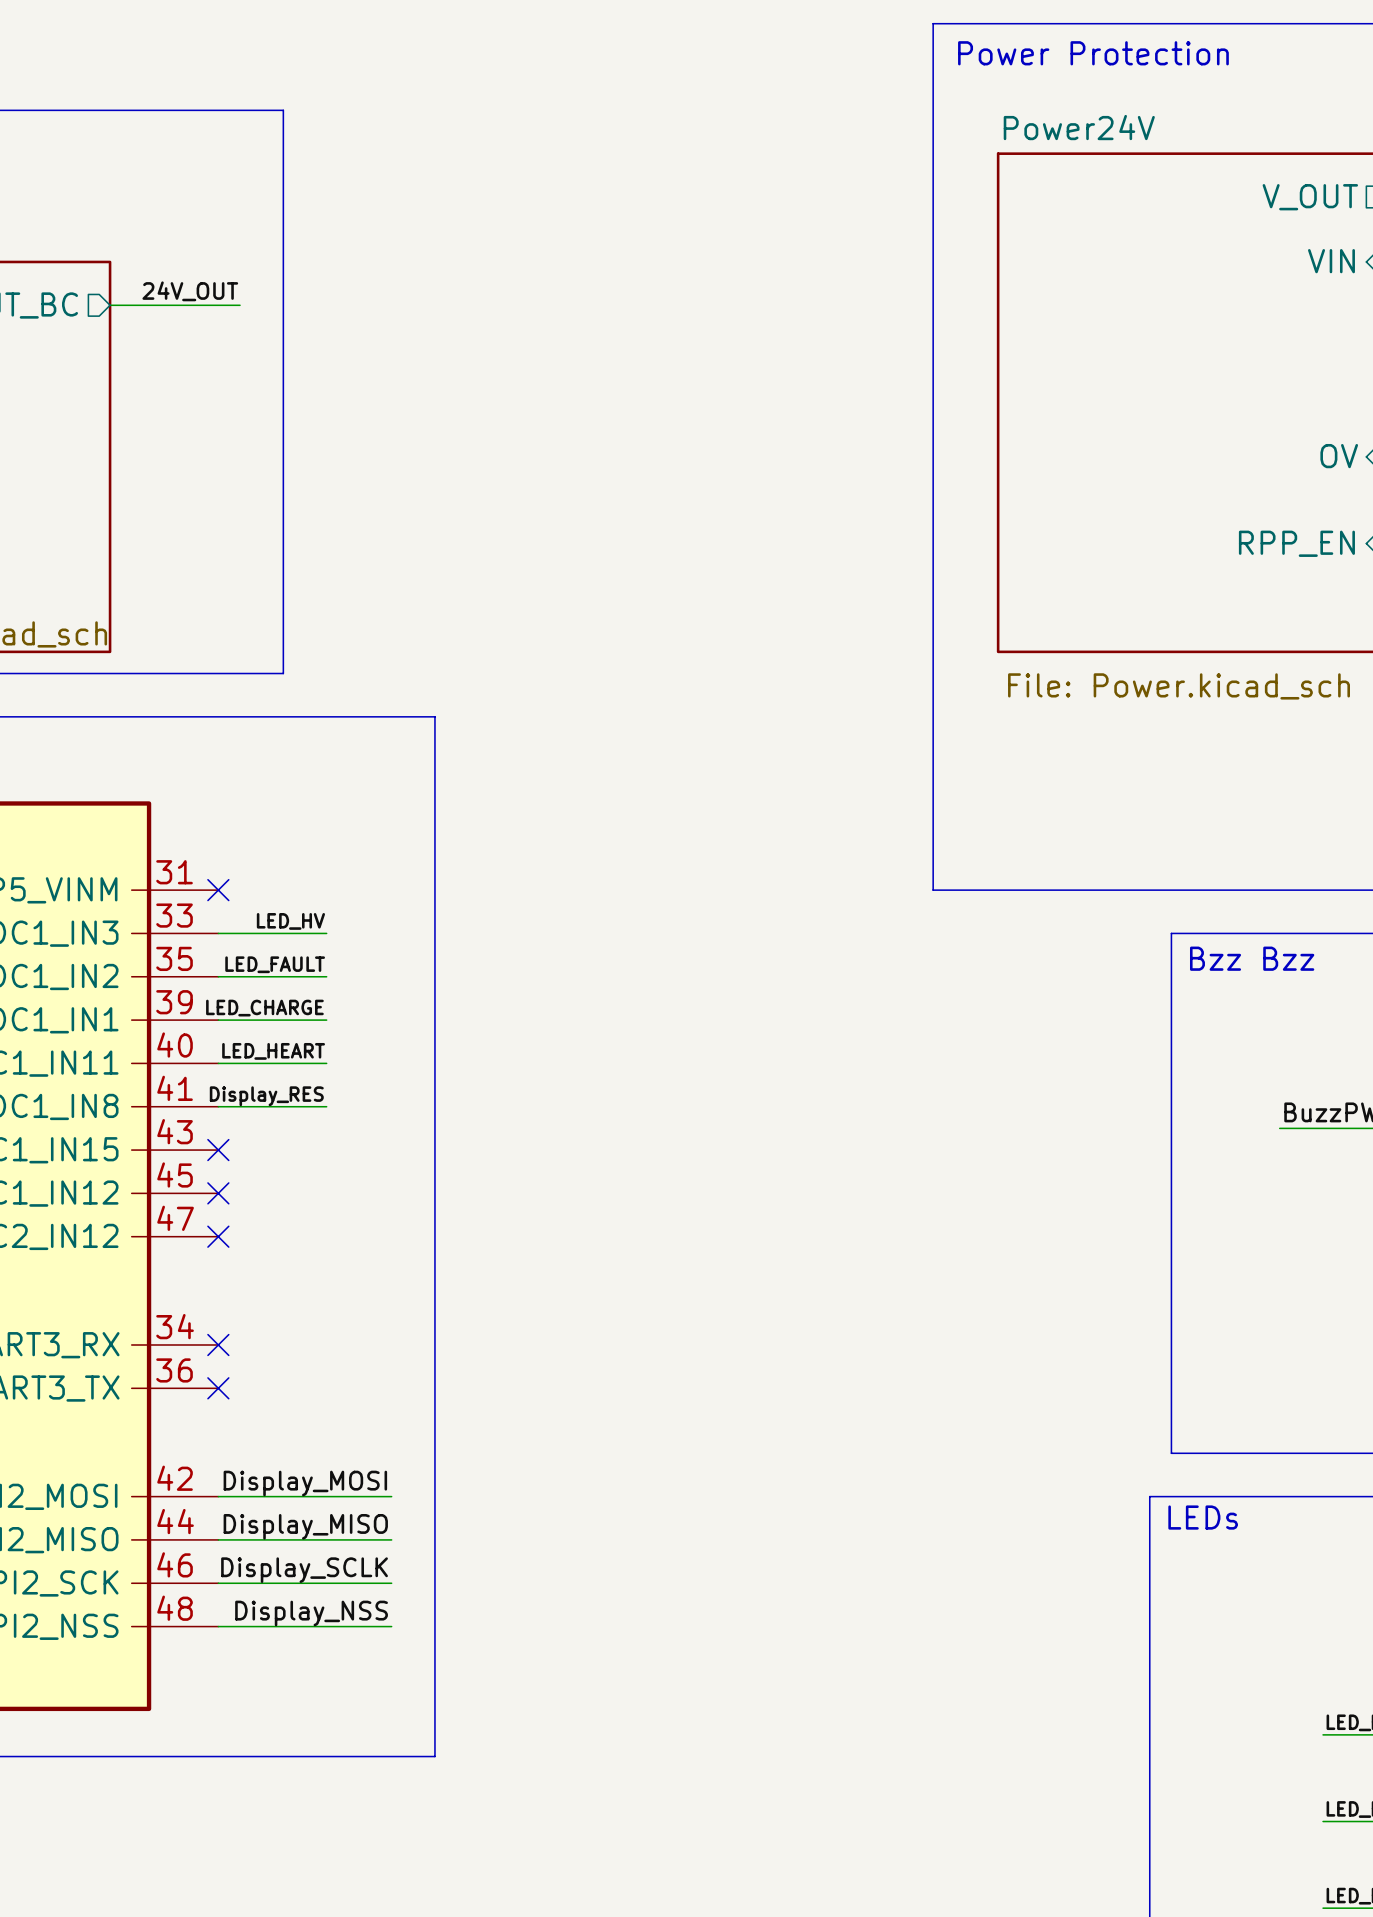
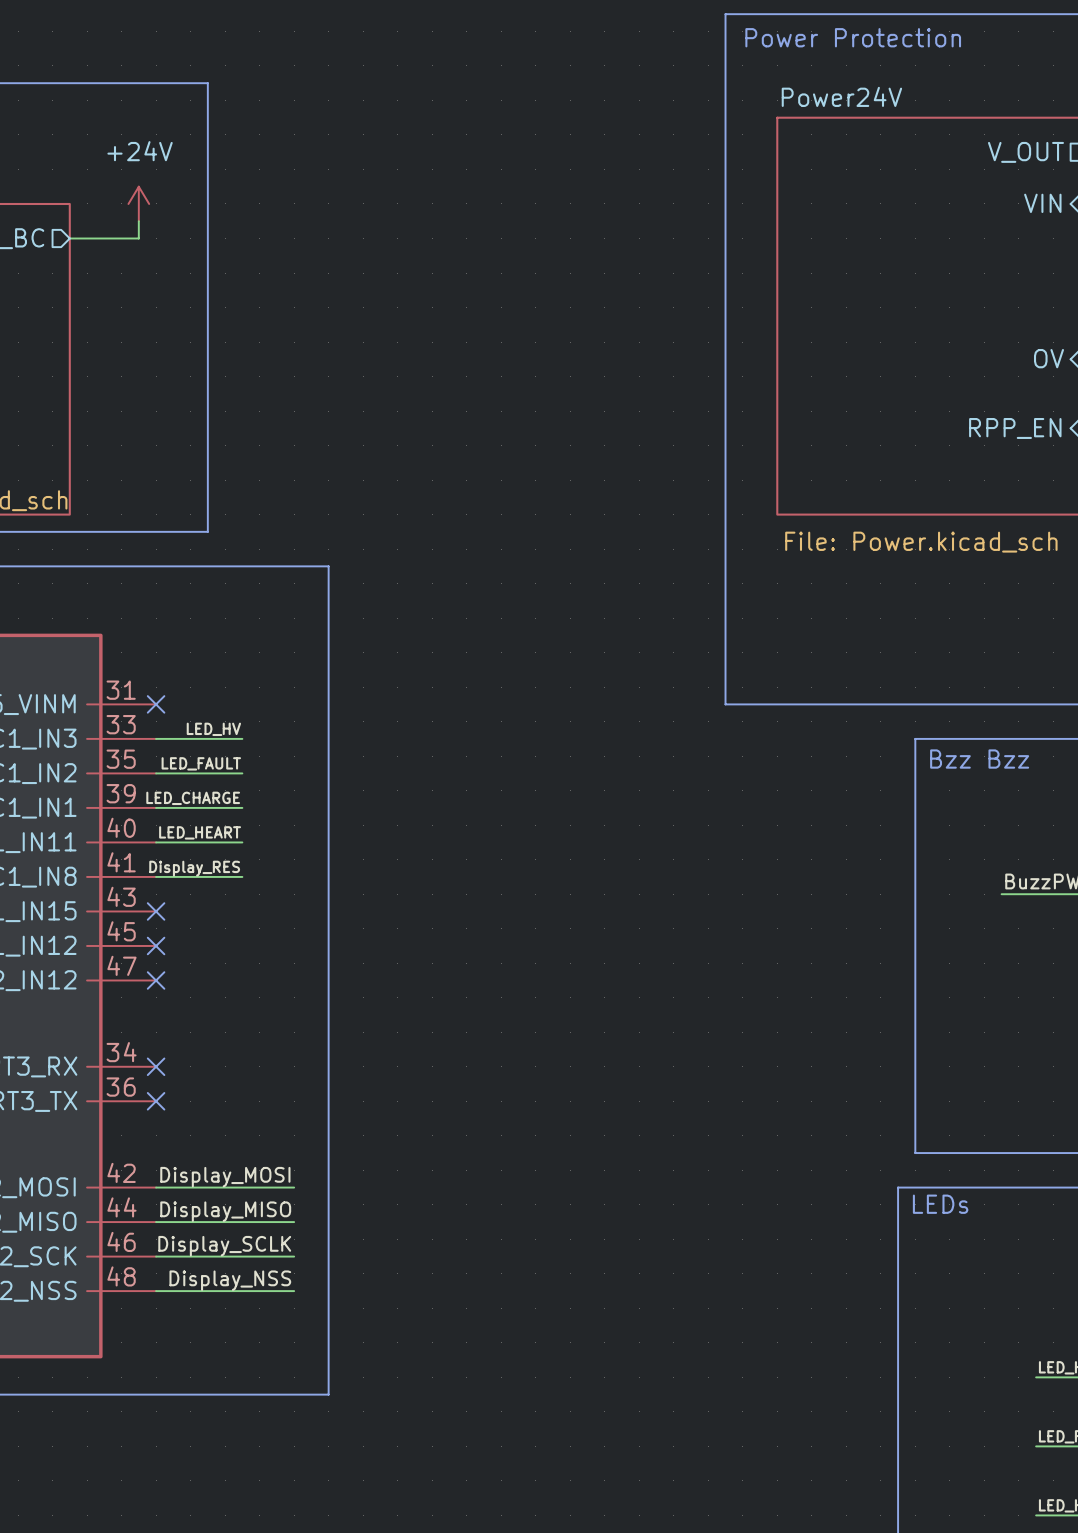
power symbol: none -> +24V (138, 203)
label: 24V_OUT (190, 291) -> none
wire: (196, 305) (240, 305) -> (138, 238) (138, 221)

